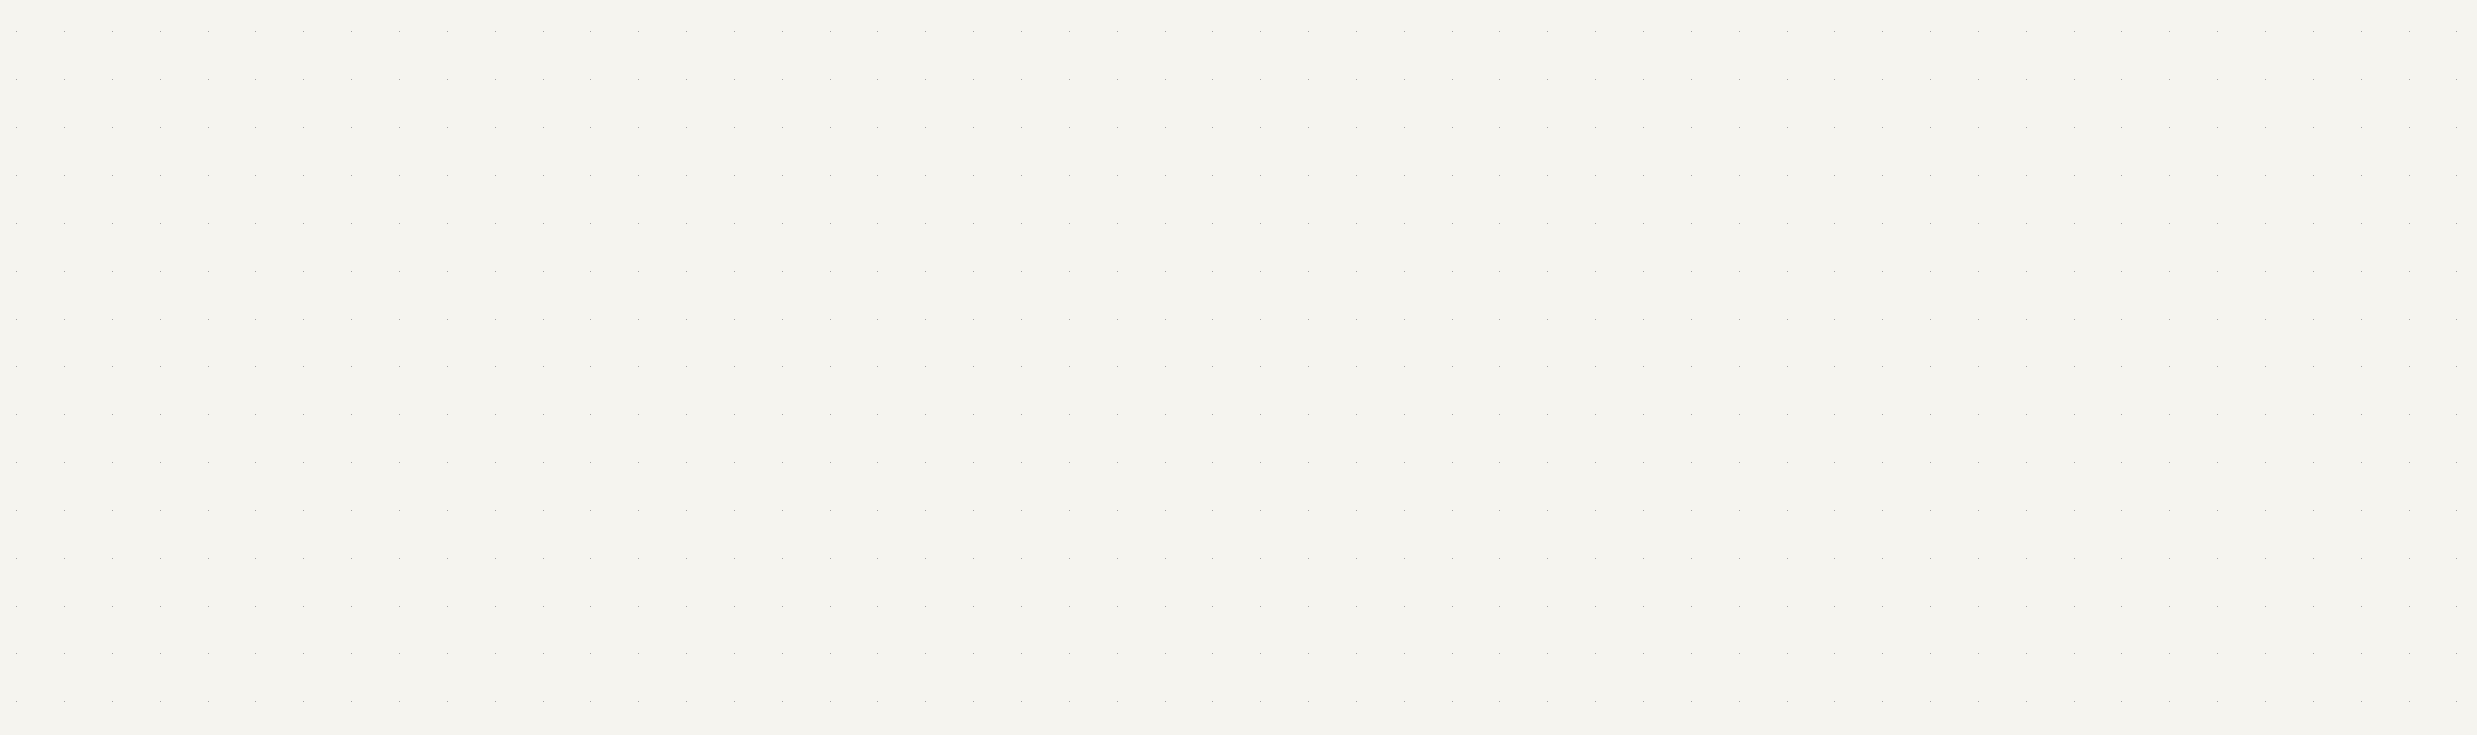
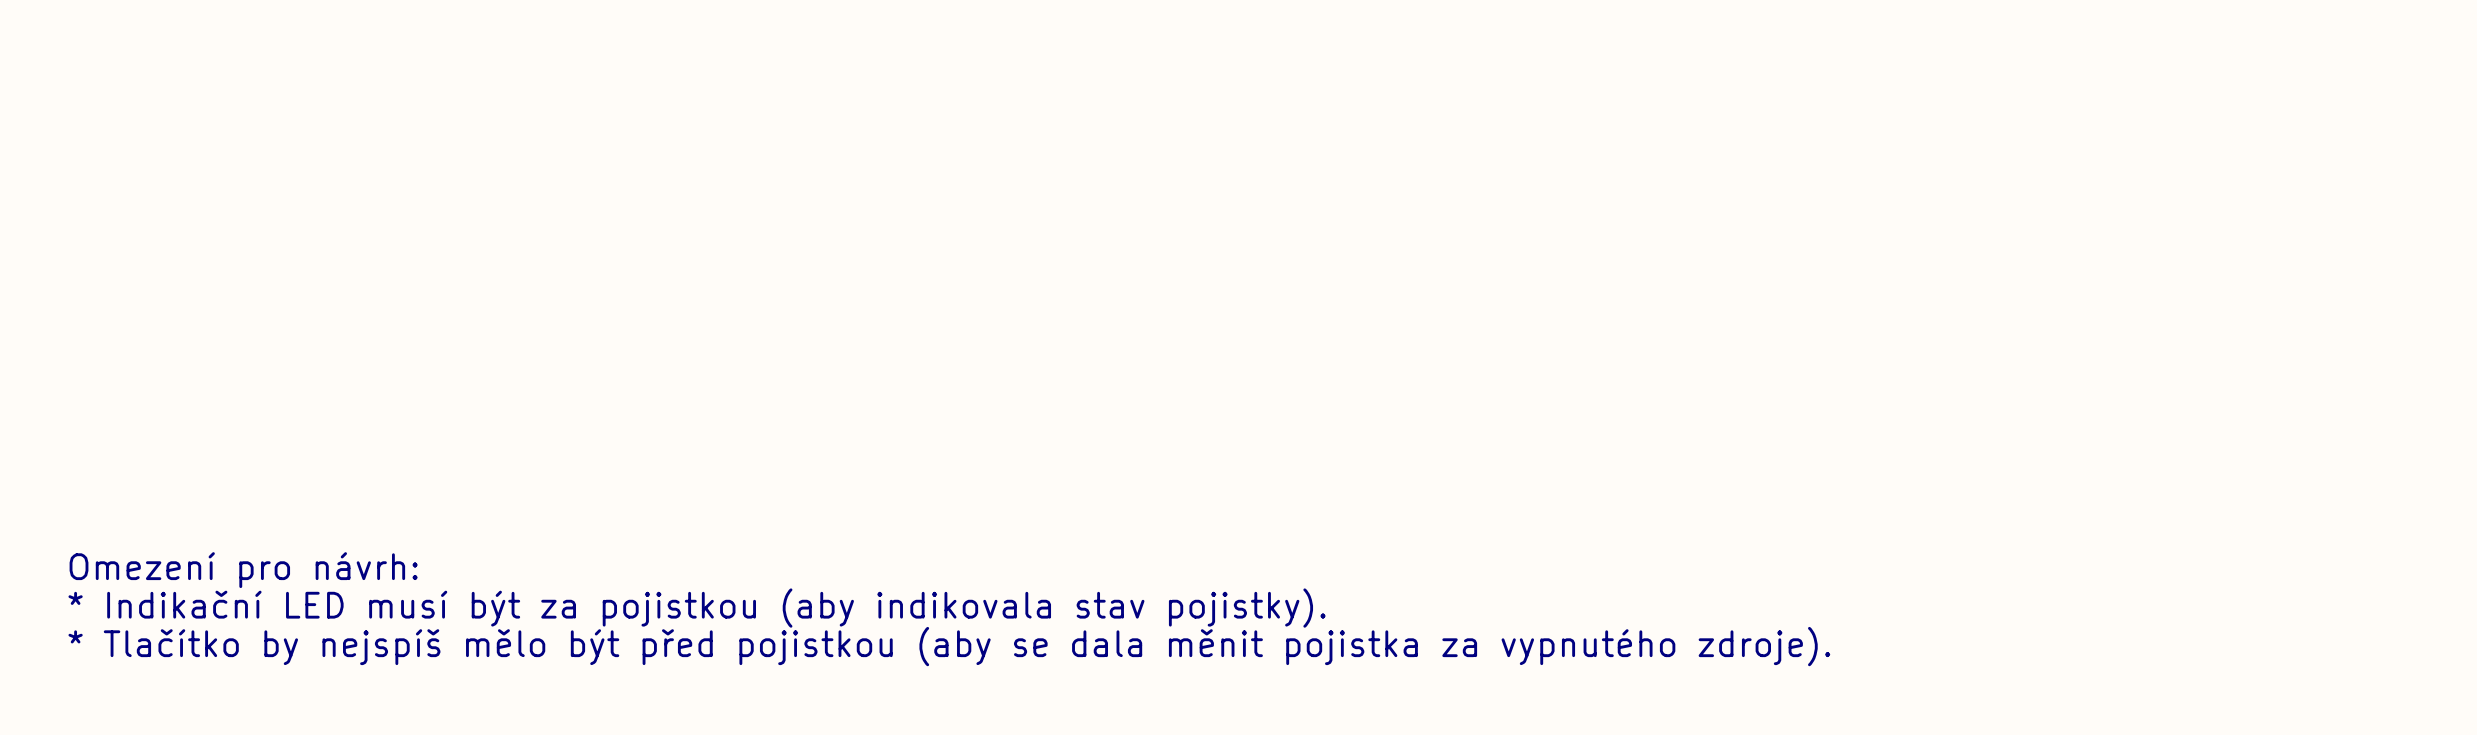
text: none -> Omezení pro návrh: (243, 570)
text: none -> * Indikační LED musí být za pojistkou (aby indikovala stav pojistky). (697, 608)
text: none -> * Tlačítko by nejspíš mělo být před pojistkou (aby se dala měnit pojistka za vypnutého zdroje). (949, 646)

